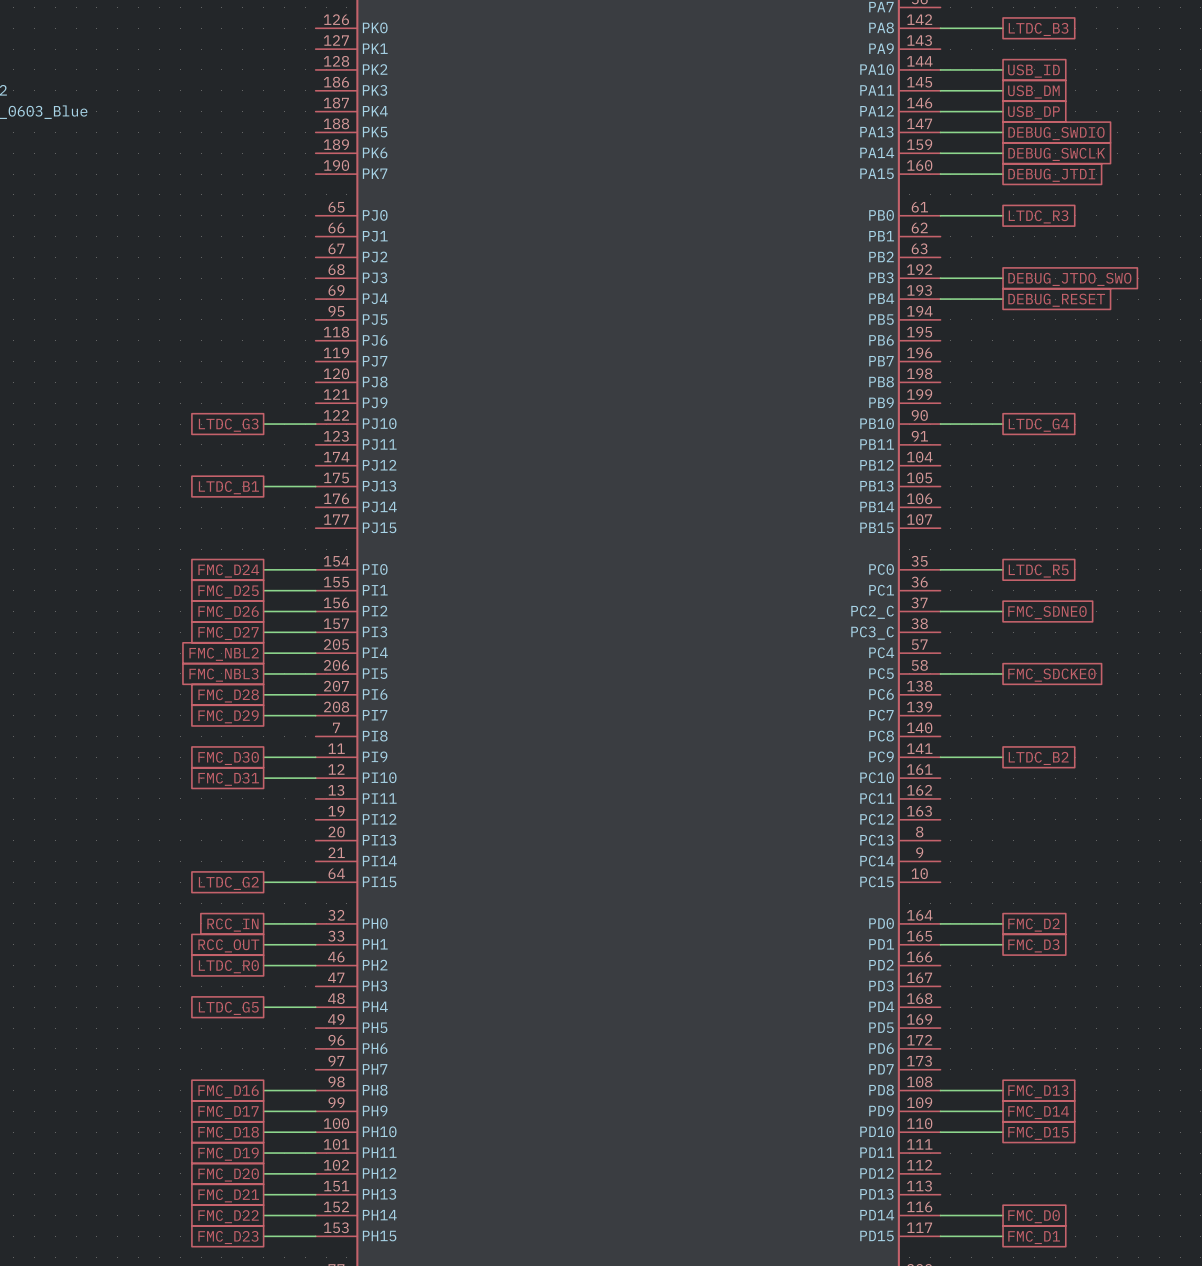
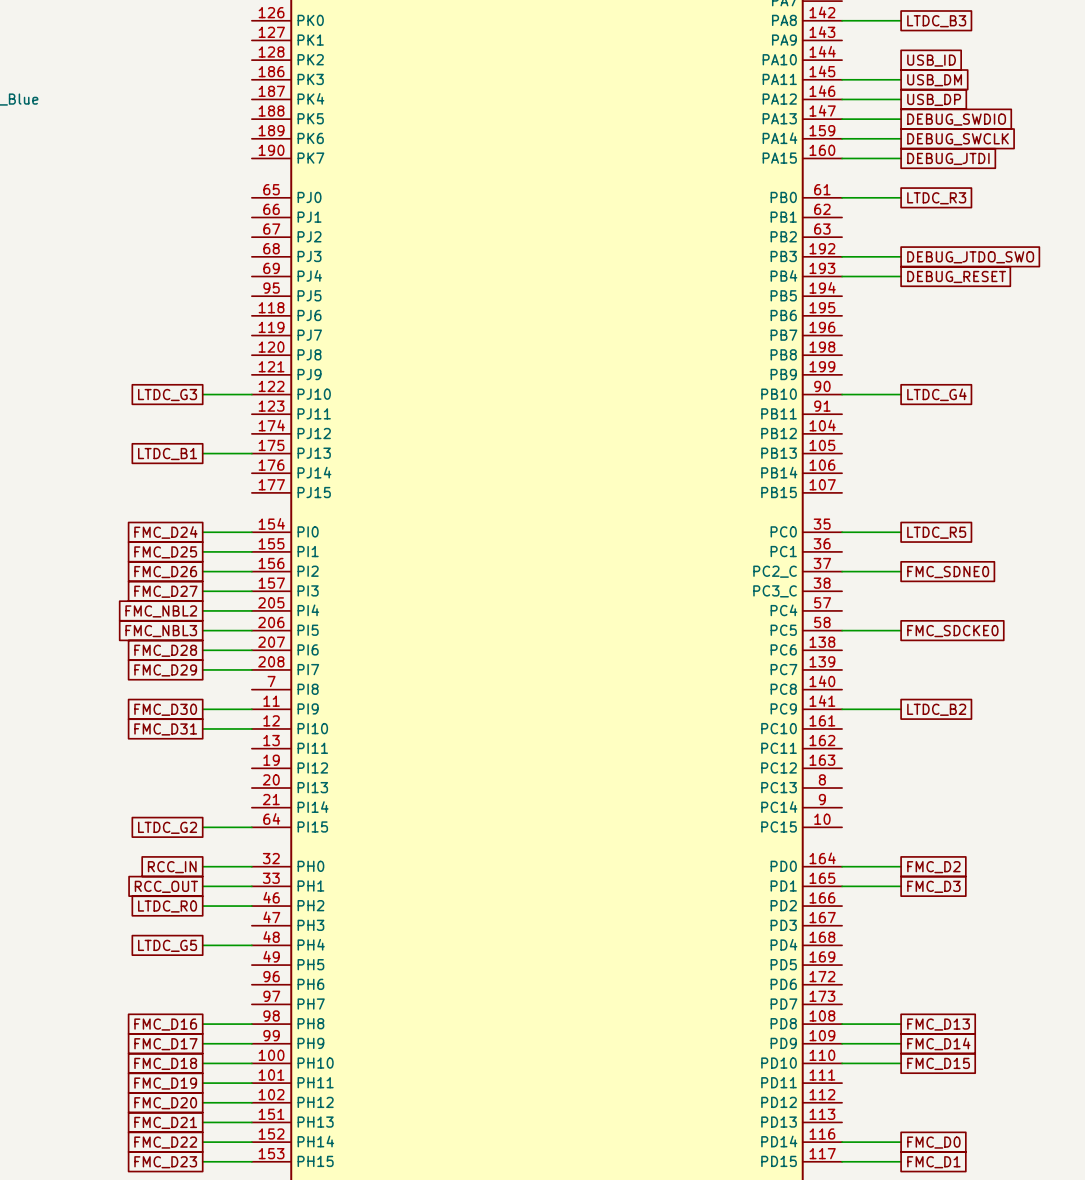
wire: (940, 69) (1003, 69) -> none

